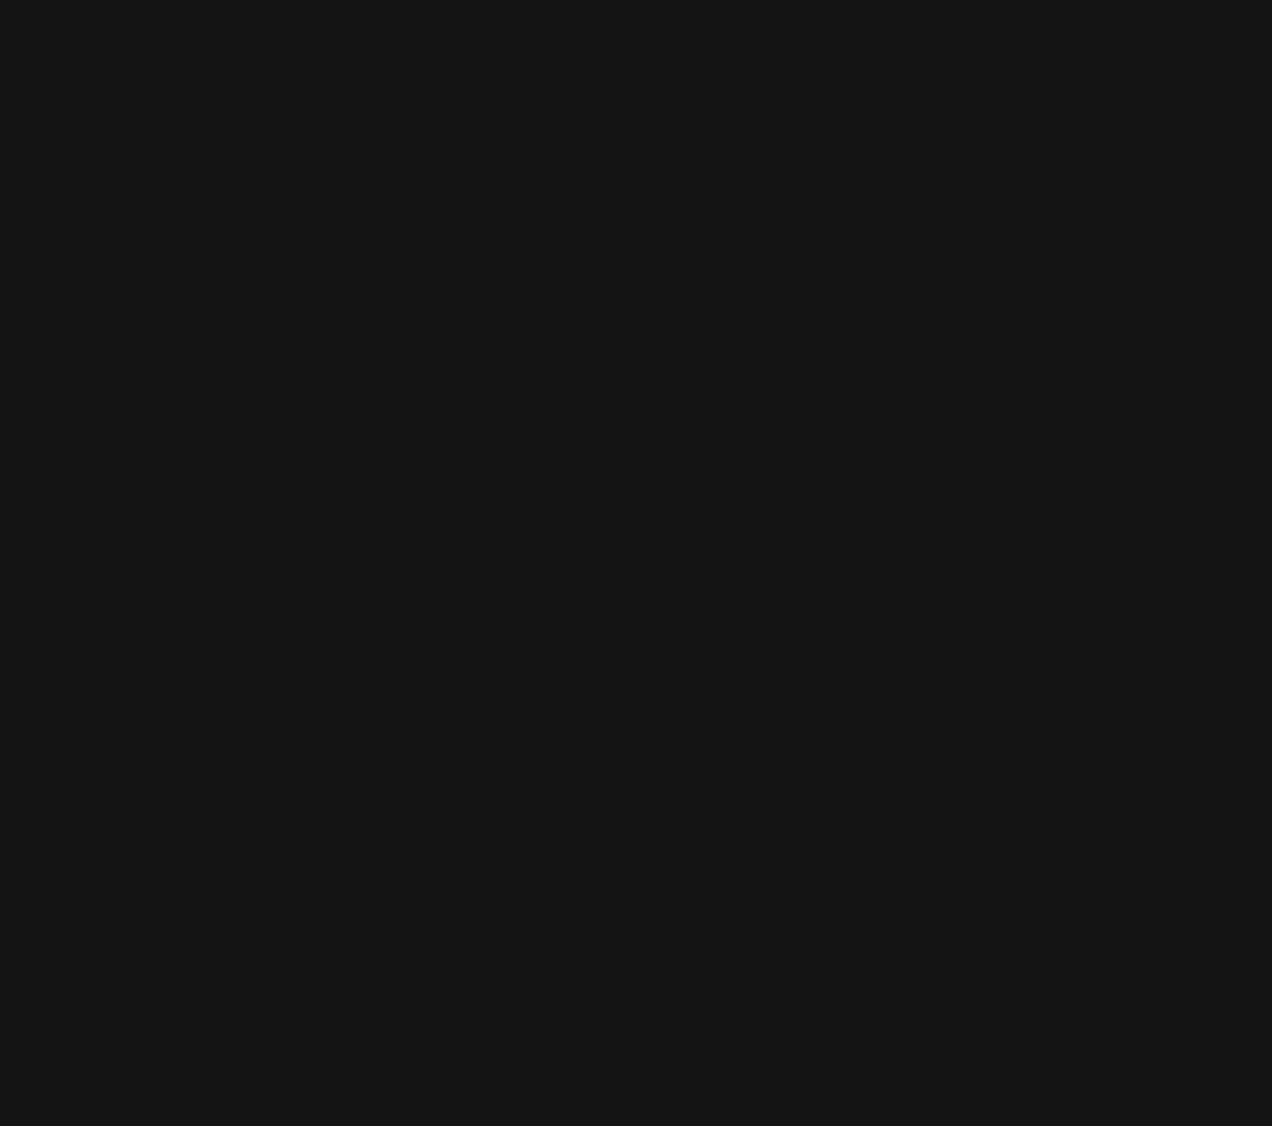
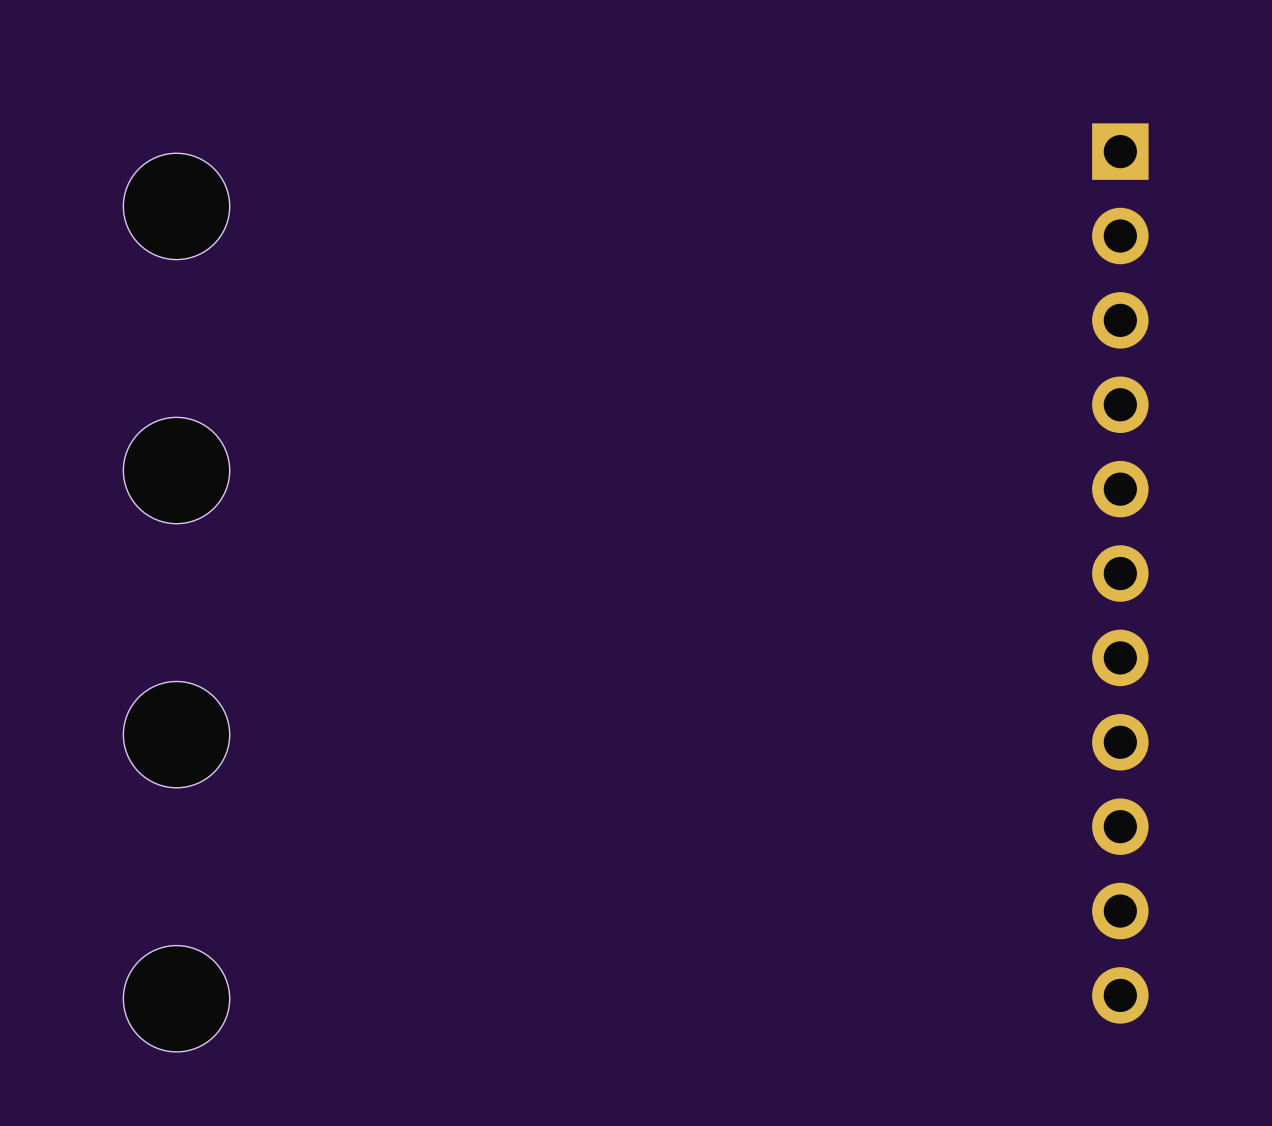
part: none -> (176, 206)
part: none -> (176, 470)
part: none -> (1120, 573)
part: none -> (176, 734)
part: none -> (176, 998)

